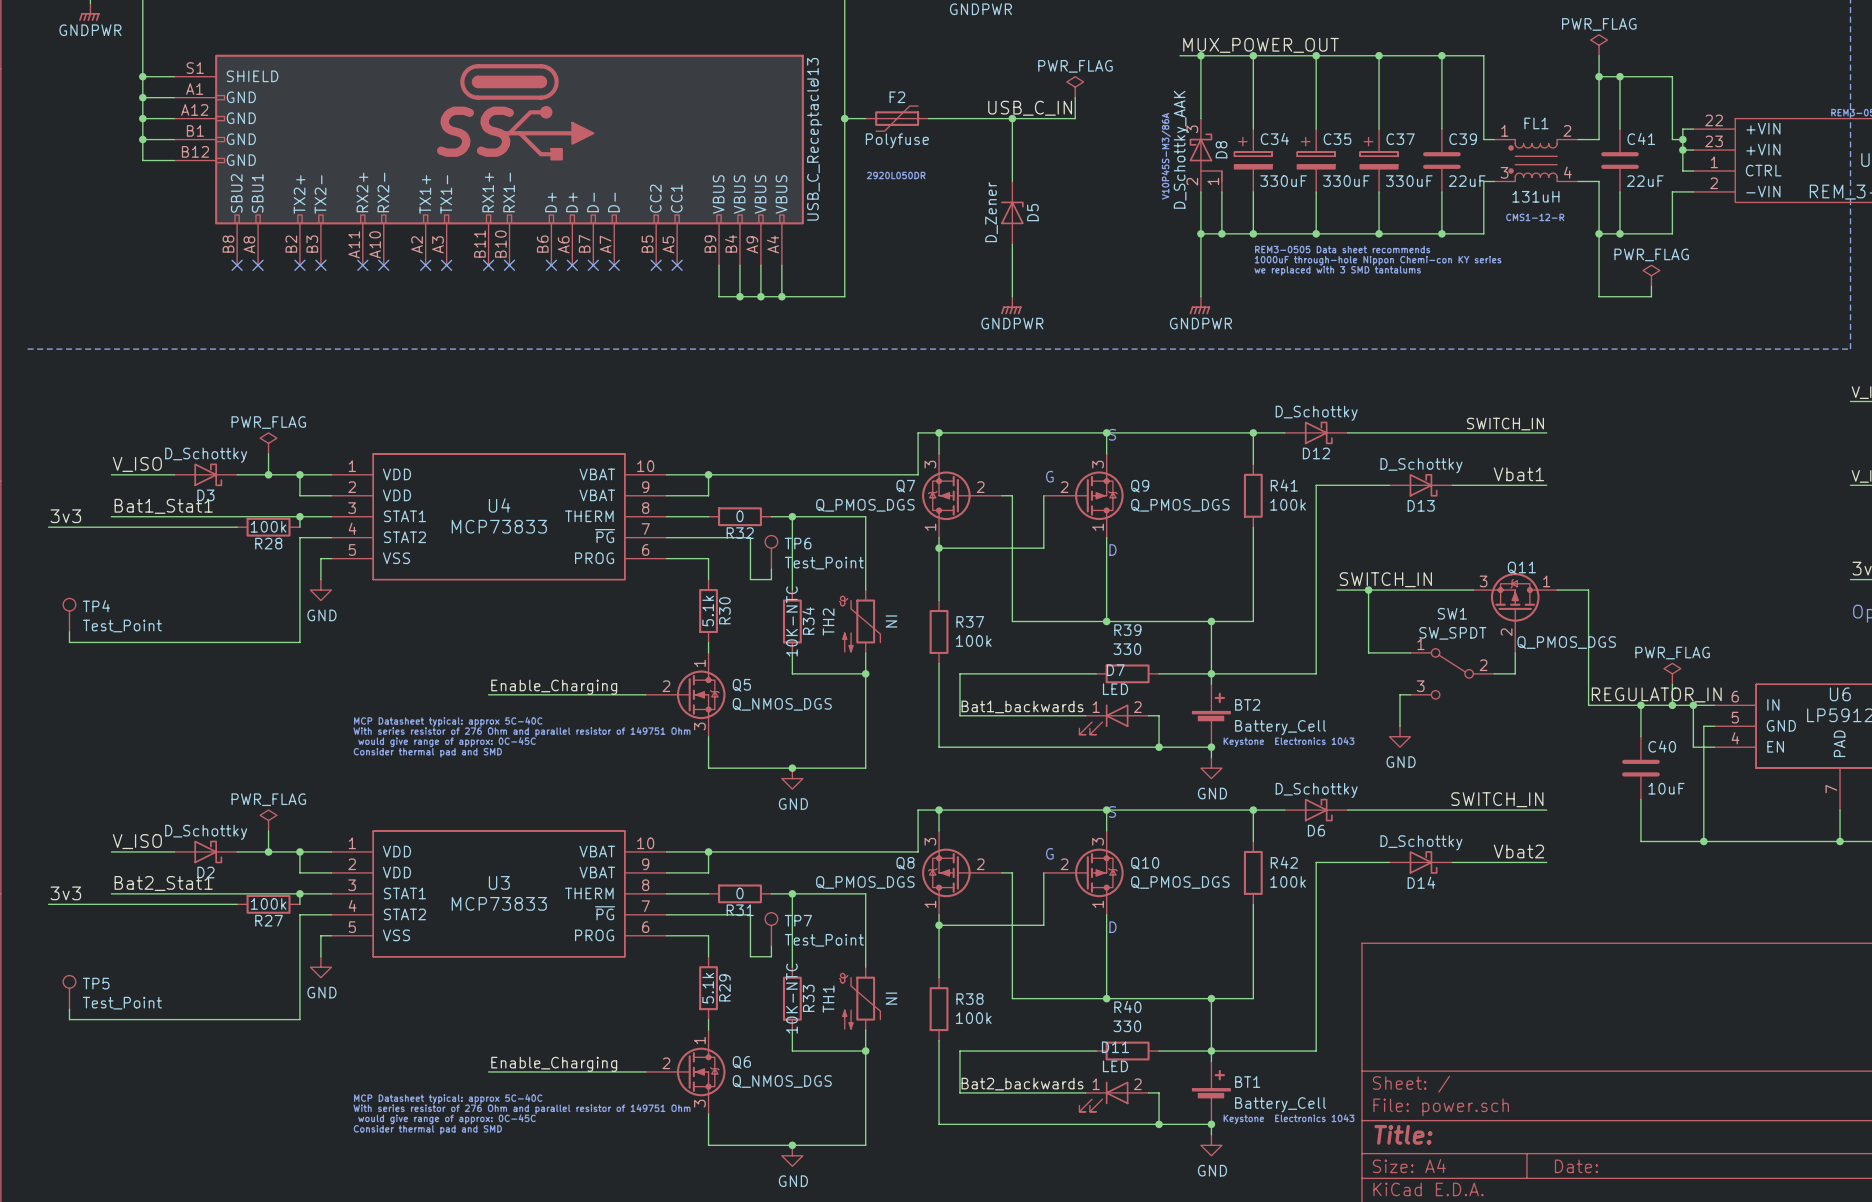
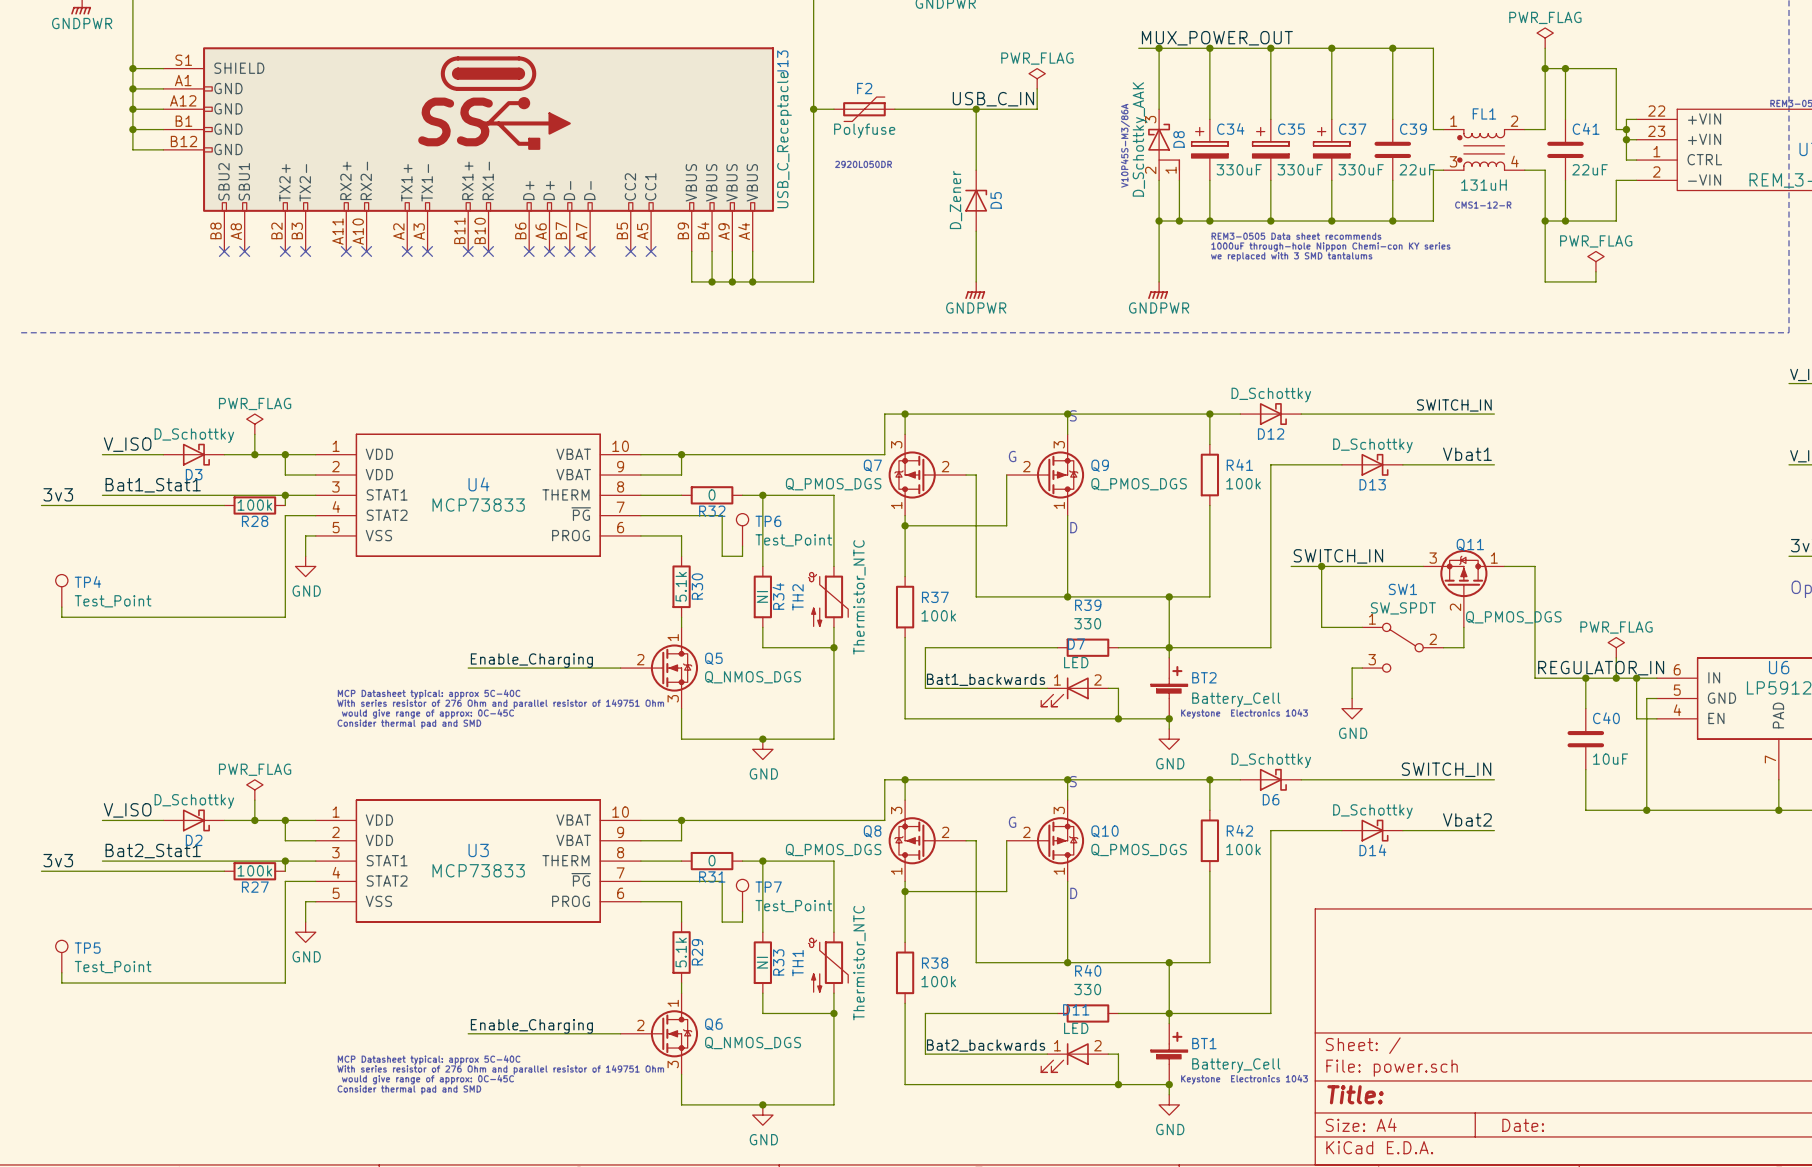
R34 value: 10K-NTC (791, 621) -> NI (762, 596)
TH2 value: NI (891, 621) -> Thermistor_NTC (859, 597)
R33 value: 10K-NTC (791, 998) -> NI (762, 962)
TH1 value: NI (891, 998) -> Thermistor_NTC (859, 963)

